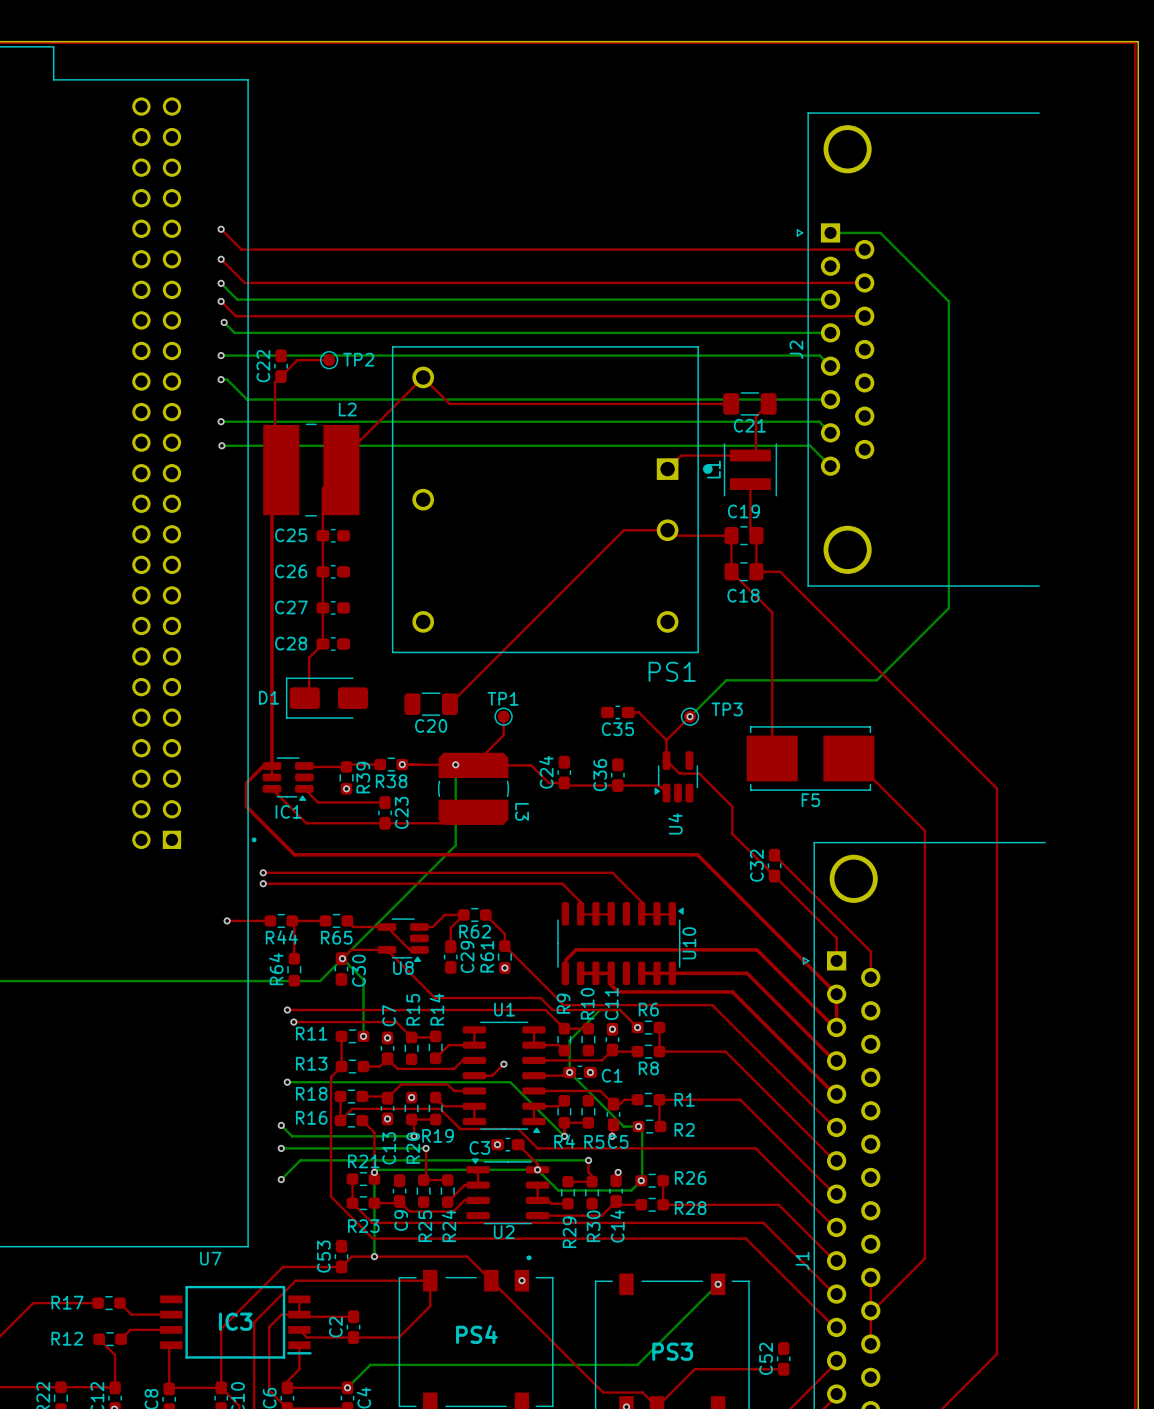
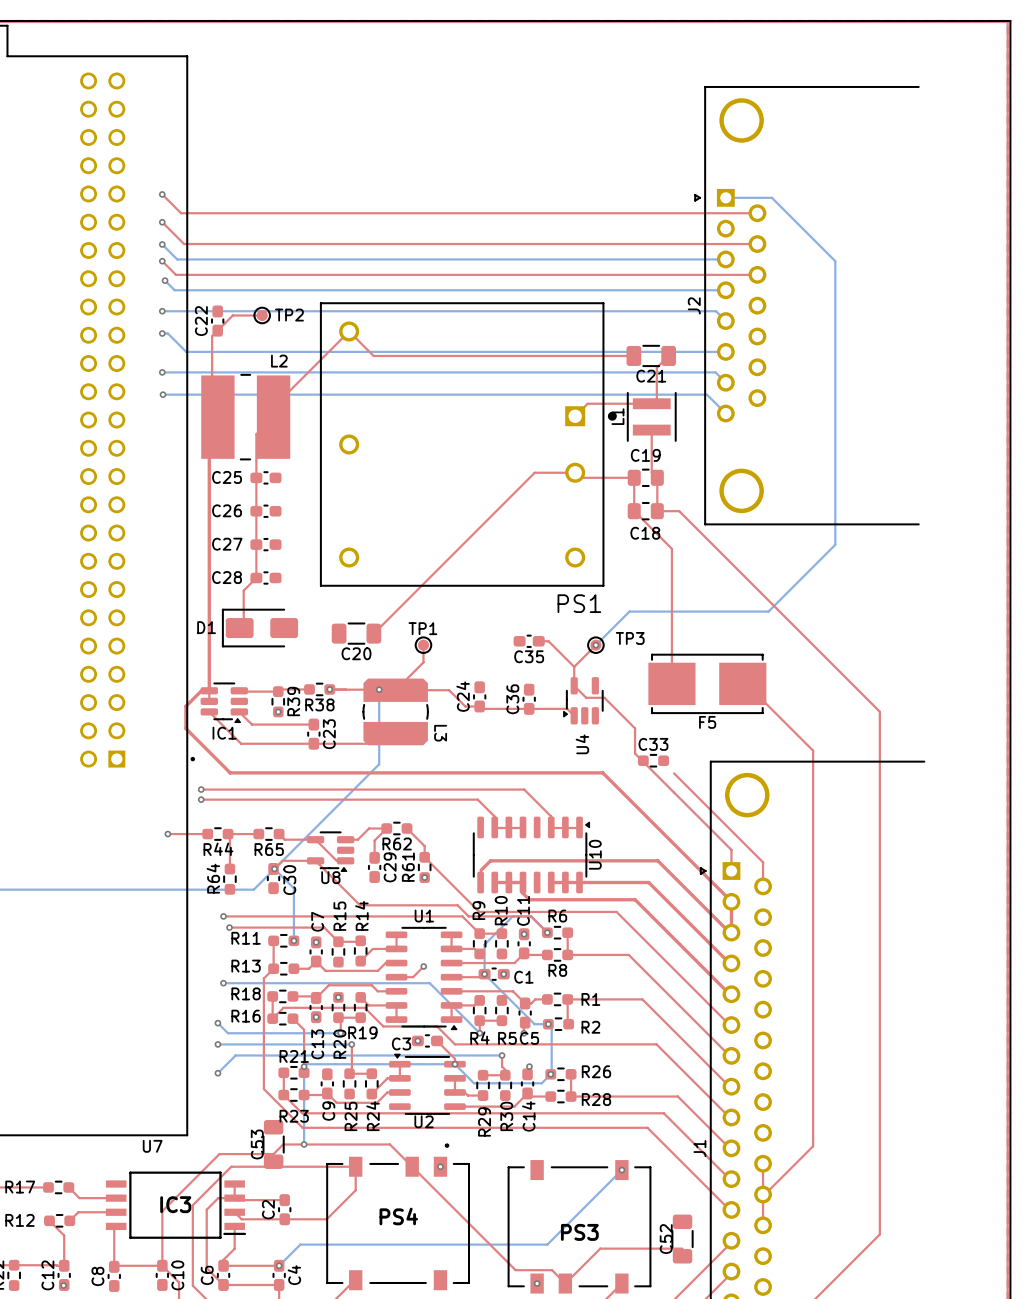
C33: none -> (653, 760)
C32: (774, 865) -> none
C53 footprint: [334, 1239, 349, 1274] -> [262, 1120, 285, 1169]
C52 footprint: [776, 1342, 791, 1376] -> [671, 1214, 694, 1264]

